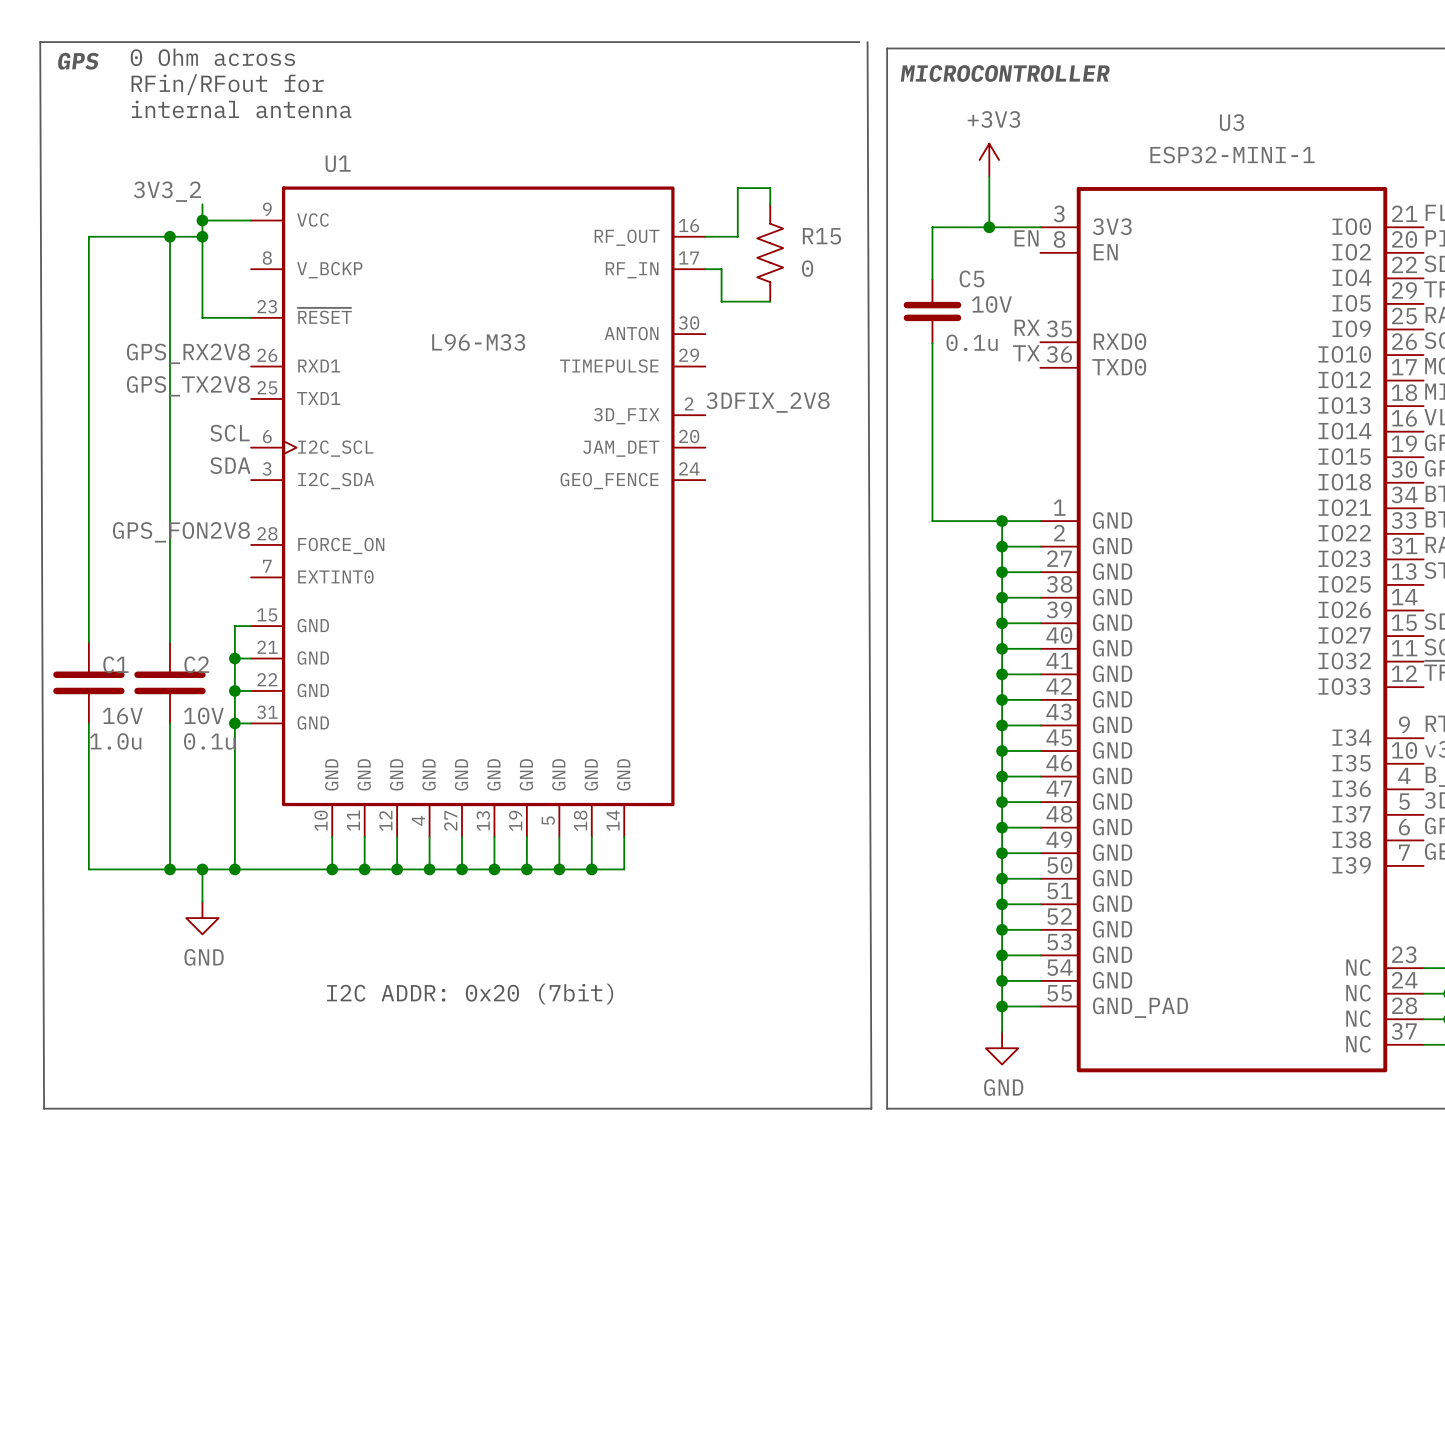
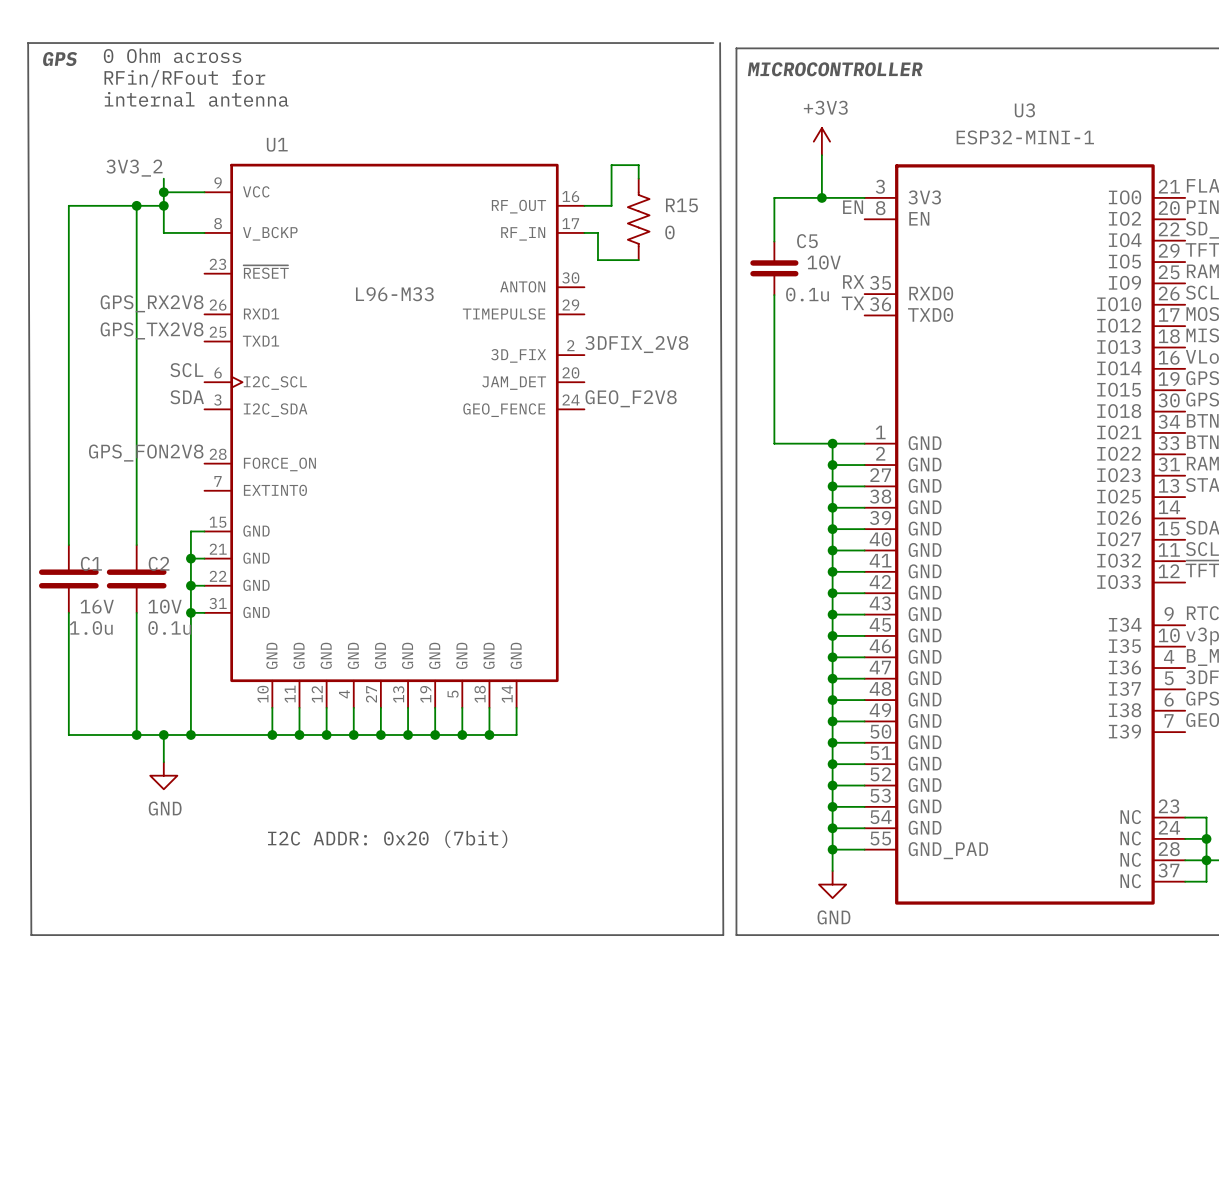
wire: (202, 269) (202, 317) (251, 317) -> (163, 232) (204, 232)
label: none -> GEO_F2V8 (631, 398)

